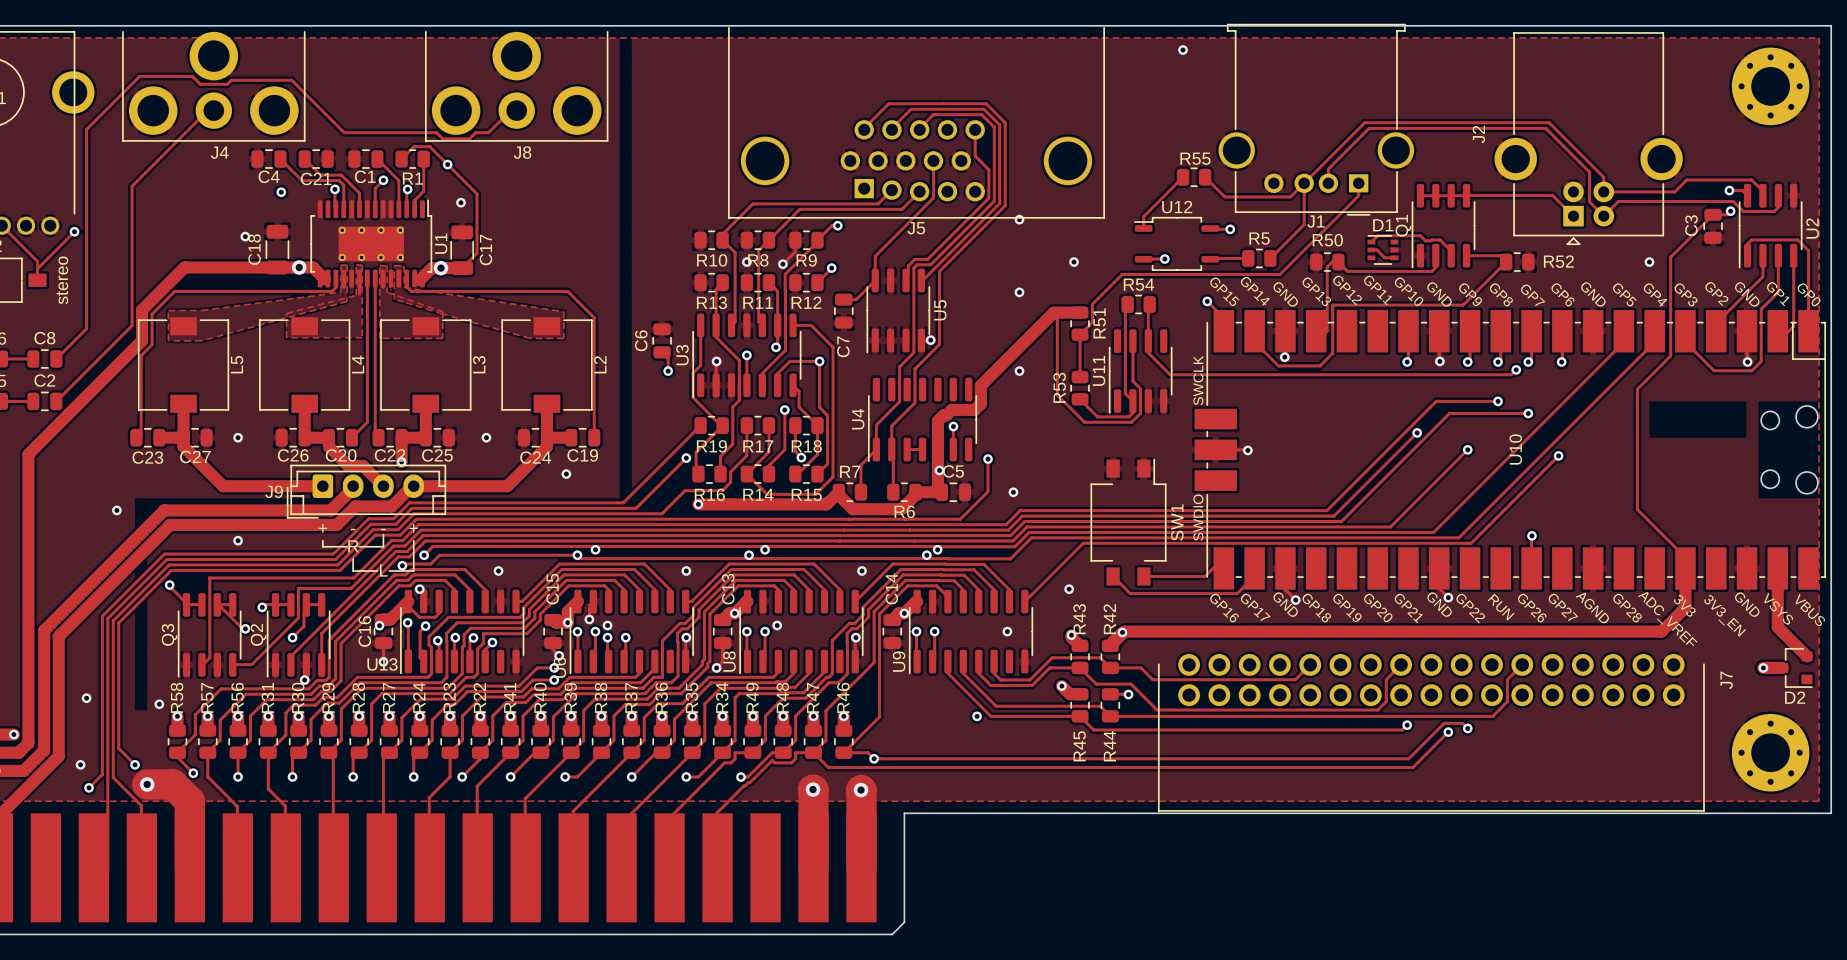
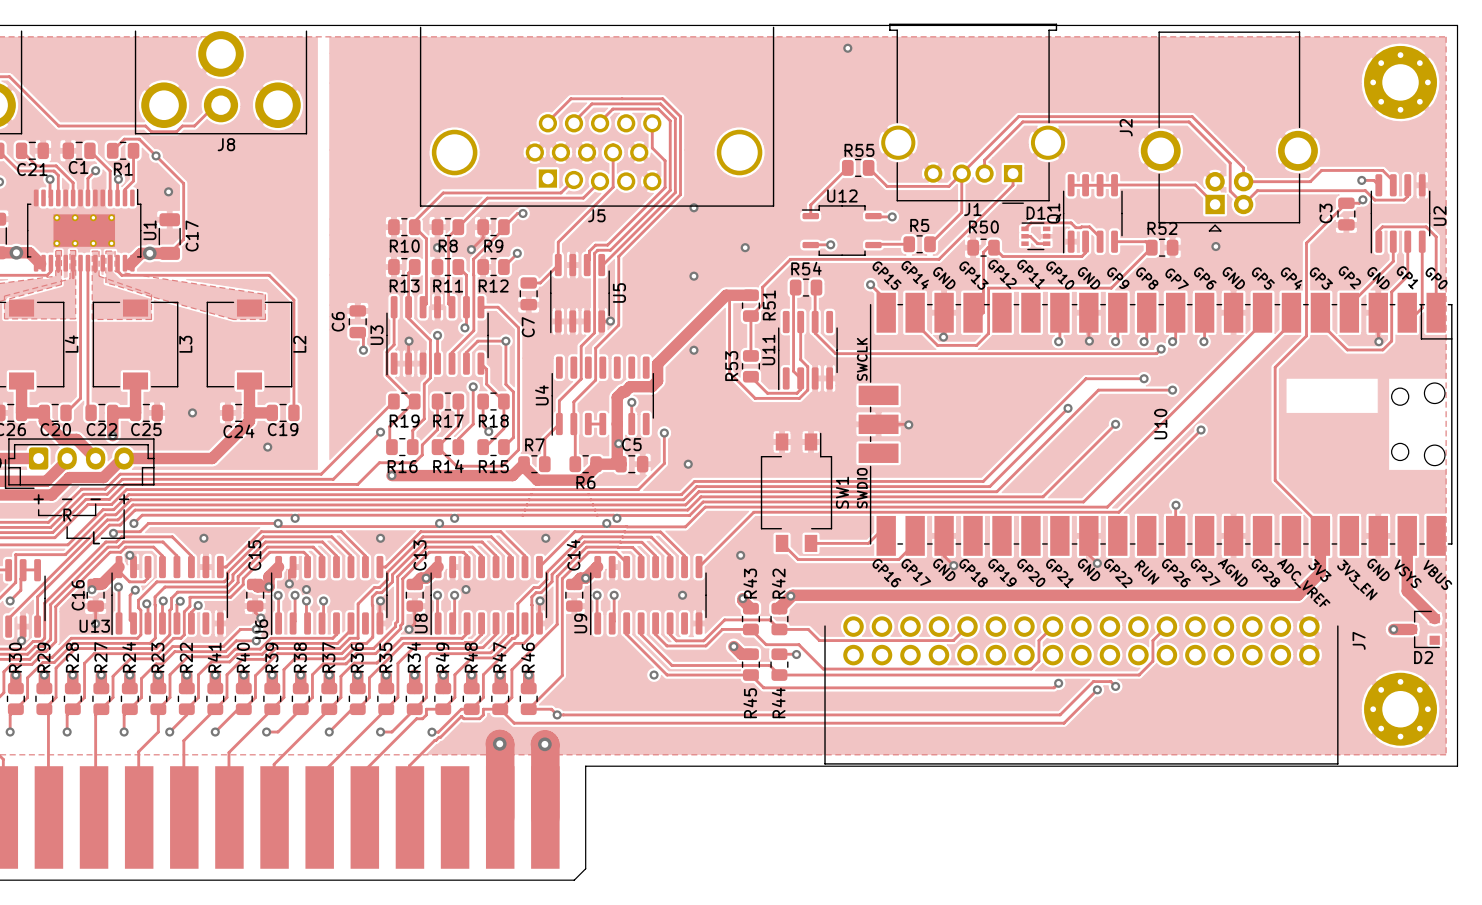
via: none -> (1215, 246)
R52 name position: R52 (1558, 261) -> R52 (1162, 228)
via: (1649, 262) -> none

